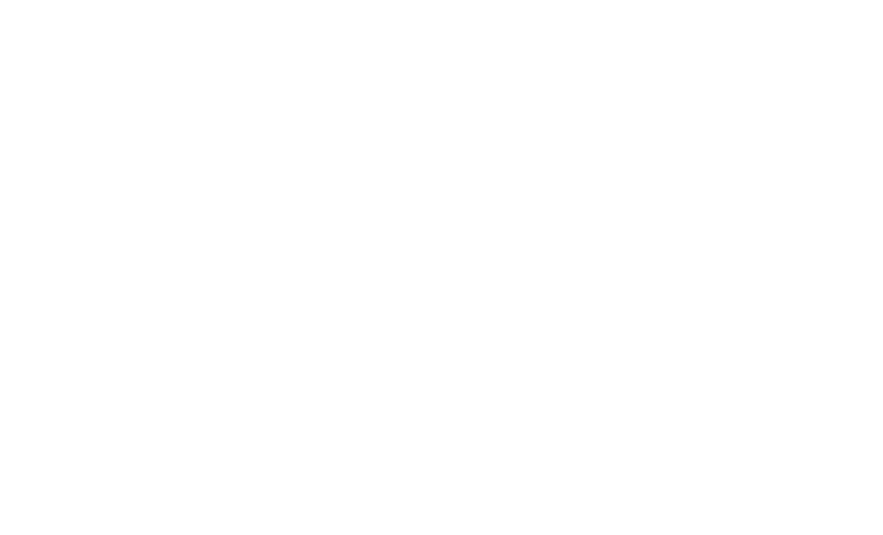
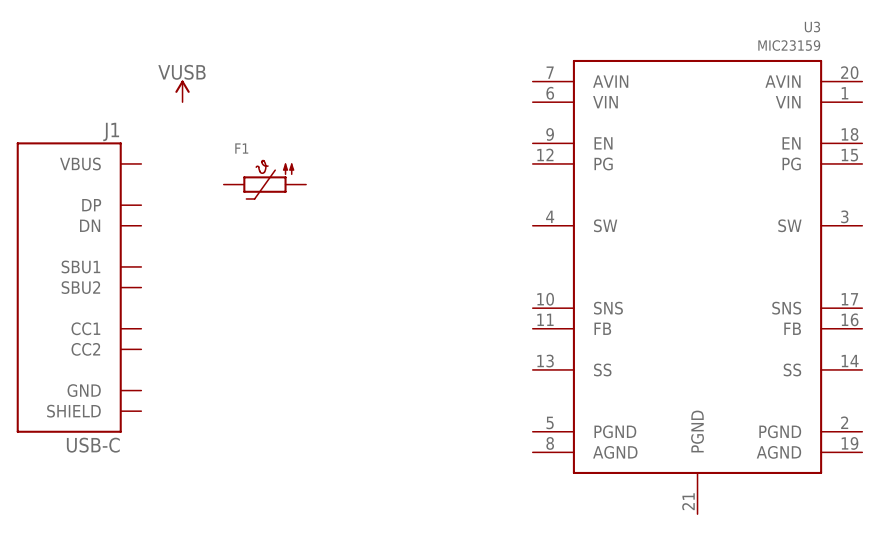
power symbol: none -> VUSB (182, 91)
F1: none -> (264, 179)
J1: none -> USB-C (79, 287)
U3: none -> MIC23159 (697, 287)

